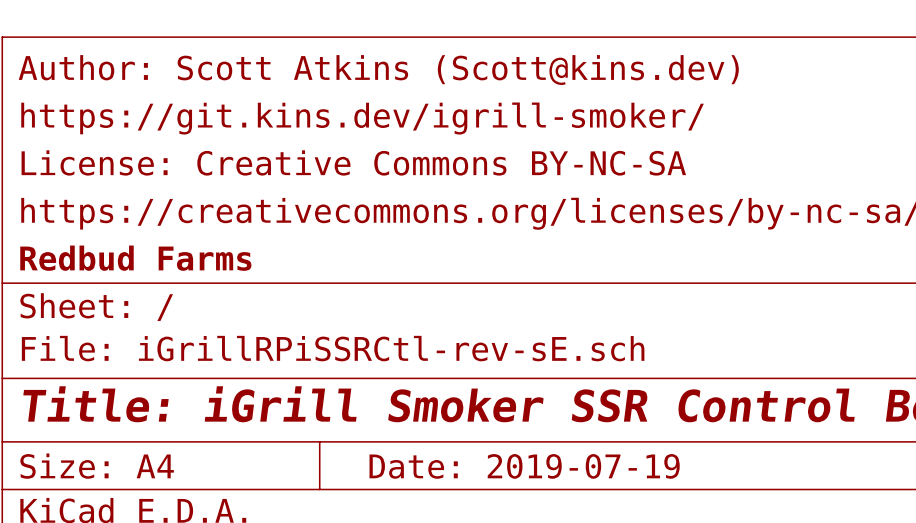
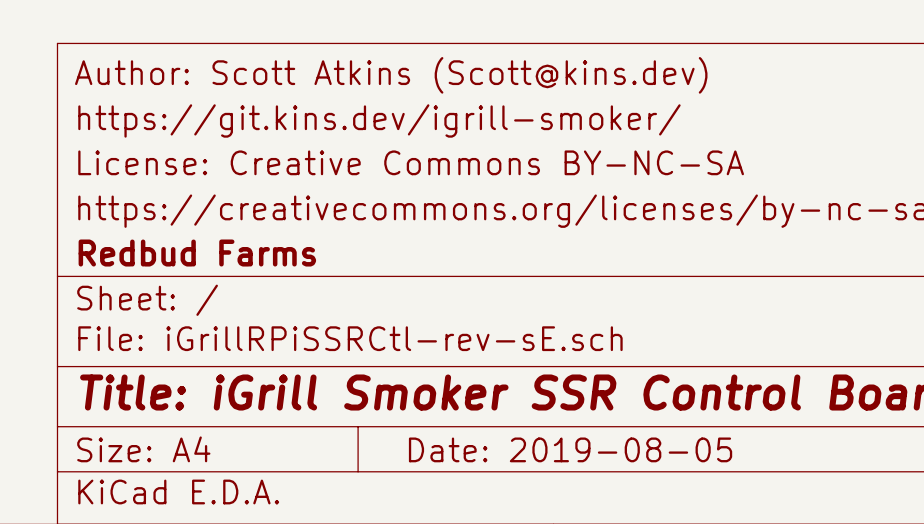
title block: Date: 2019-07-19 (524, 466) -> Date: 2019-08-05 (570, 449)

